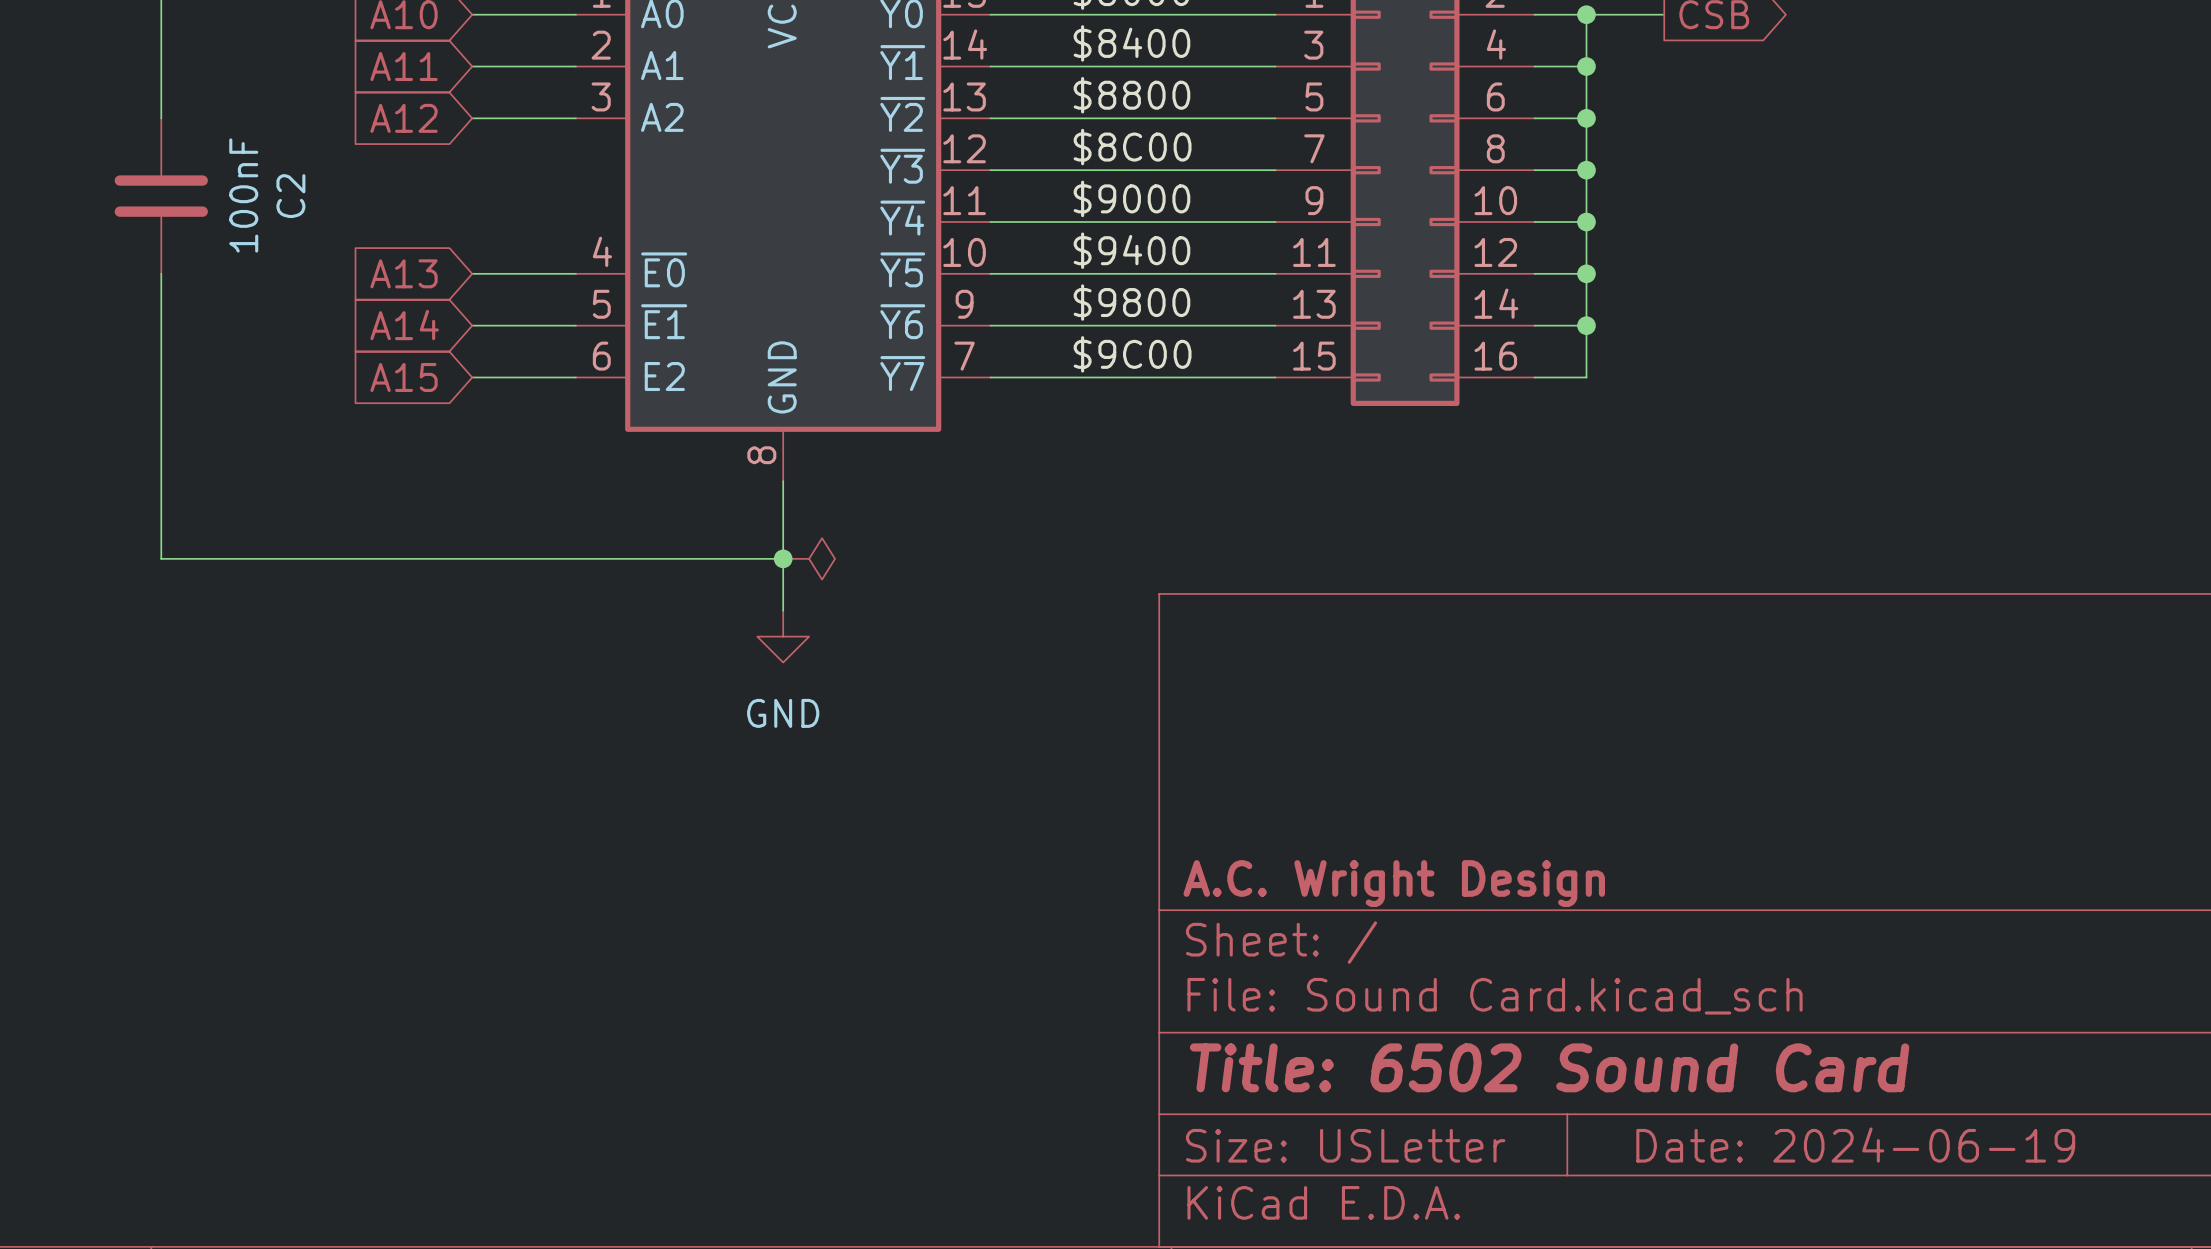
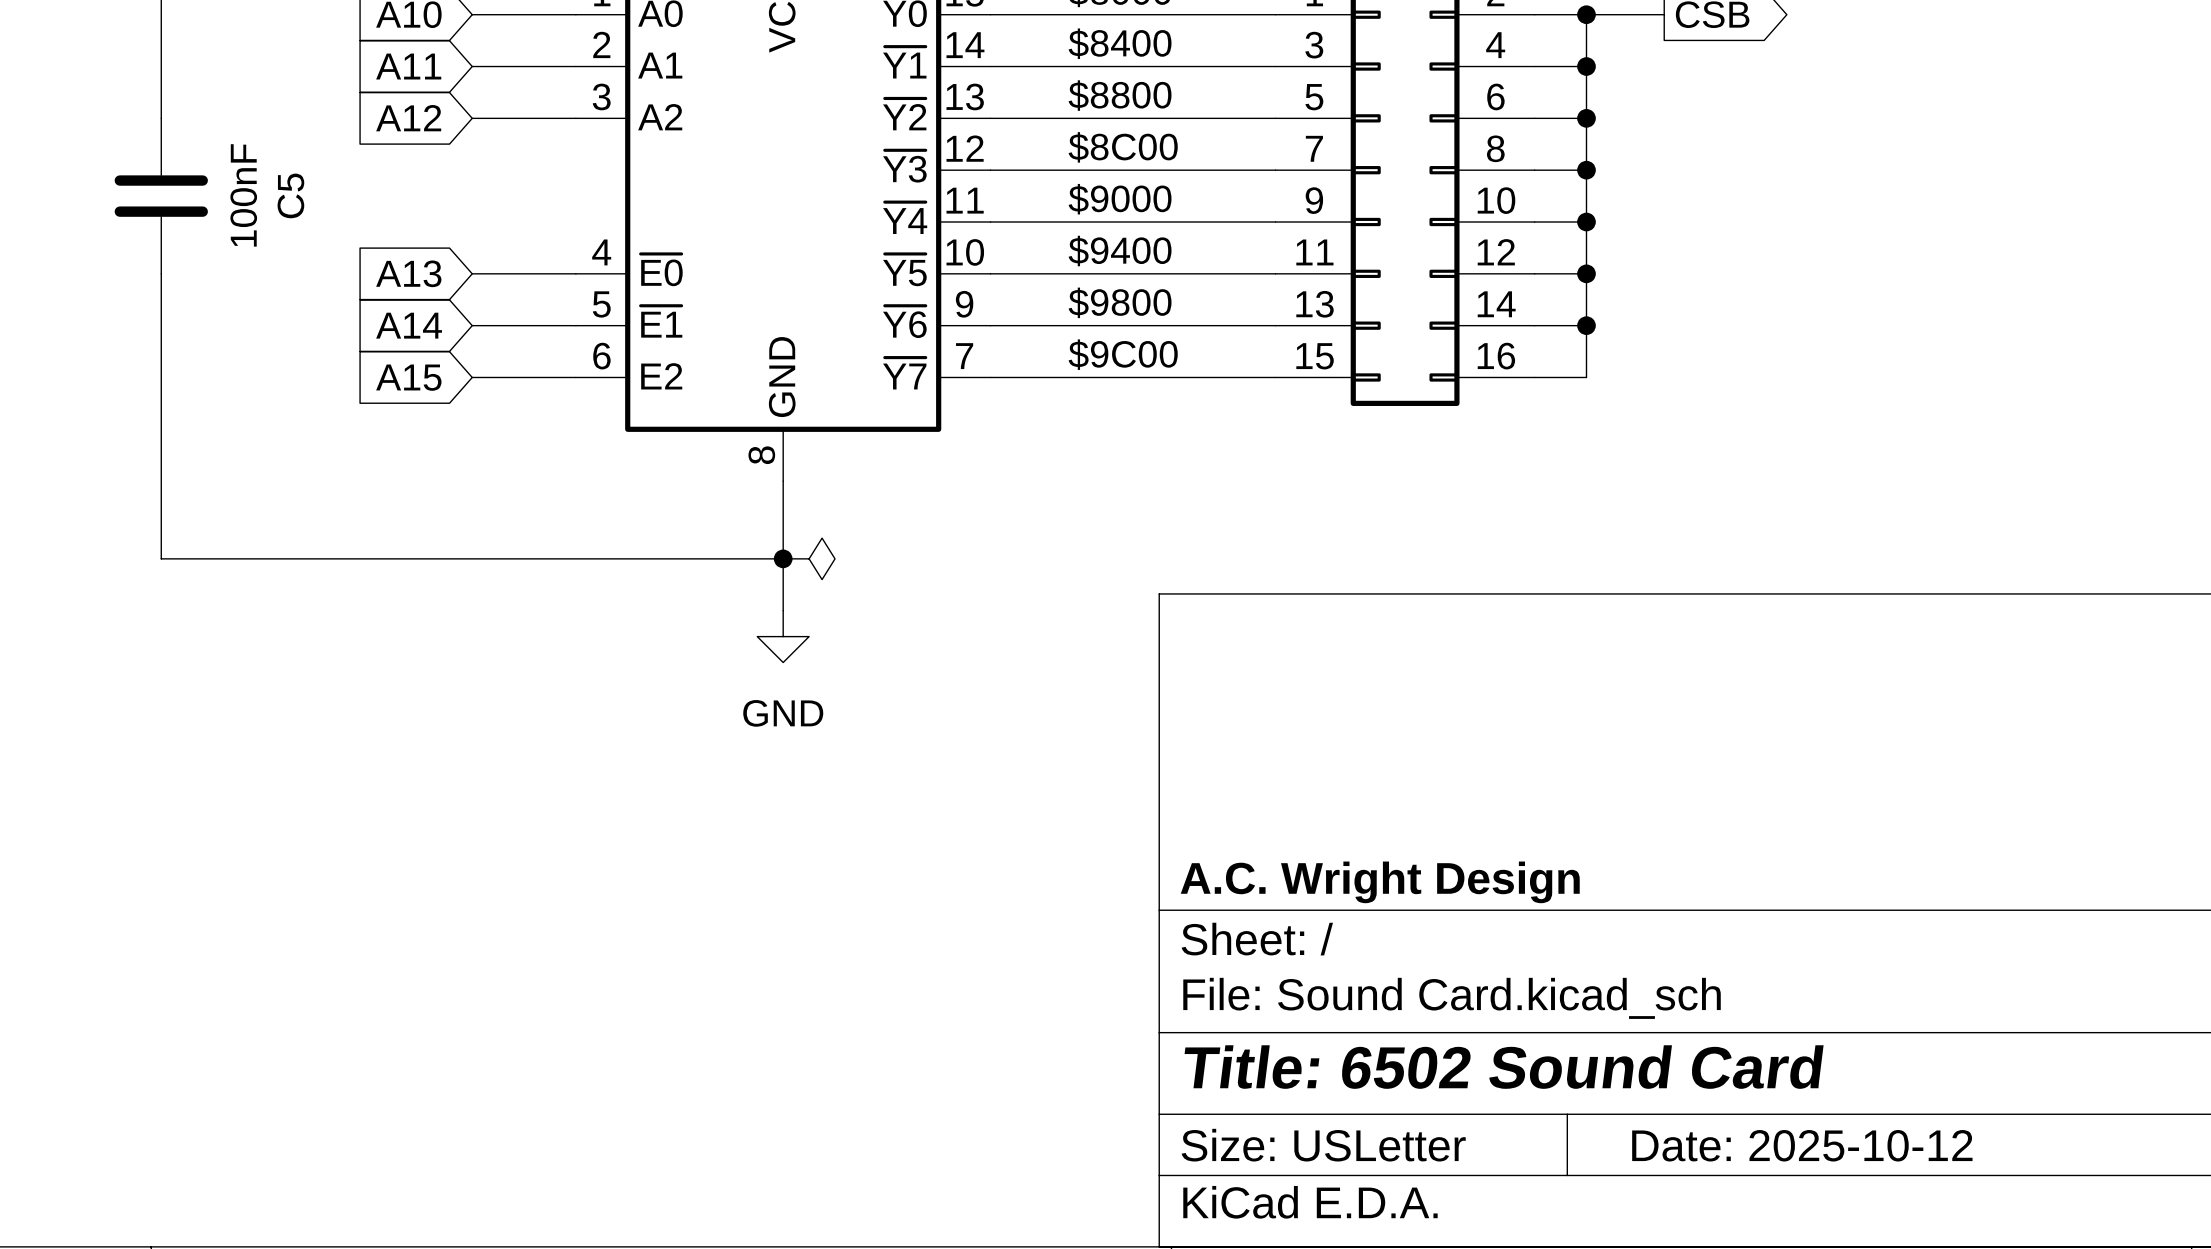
C2 name: C2 (290, 196) -> C5 (290, 195)
title block: Date: 2024-06-19 (1855, 1145) -> Date: 2025-10-12 (1802, 1145)

